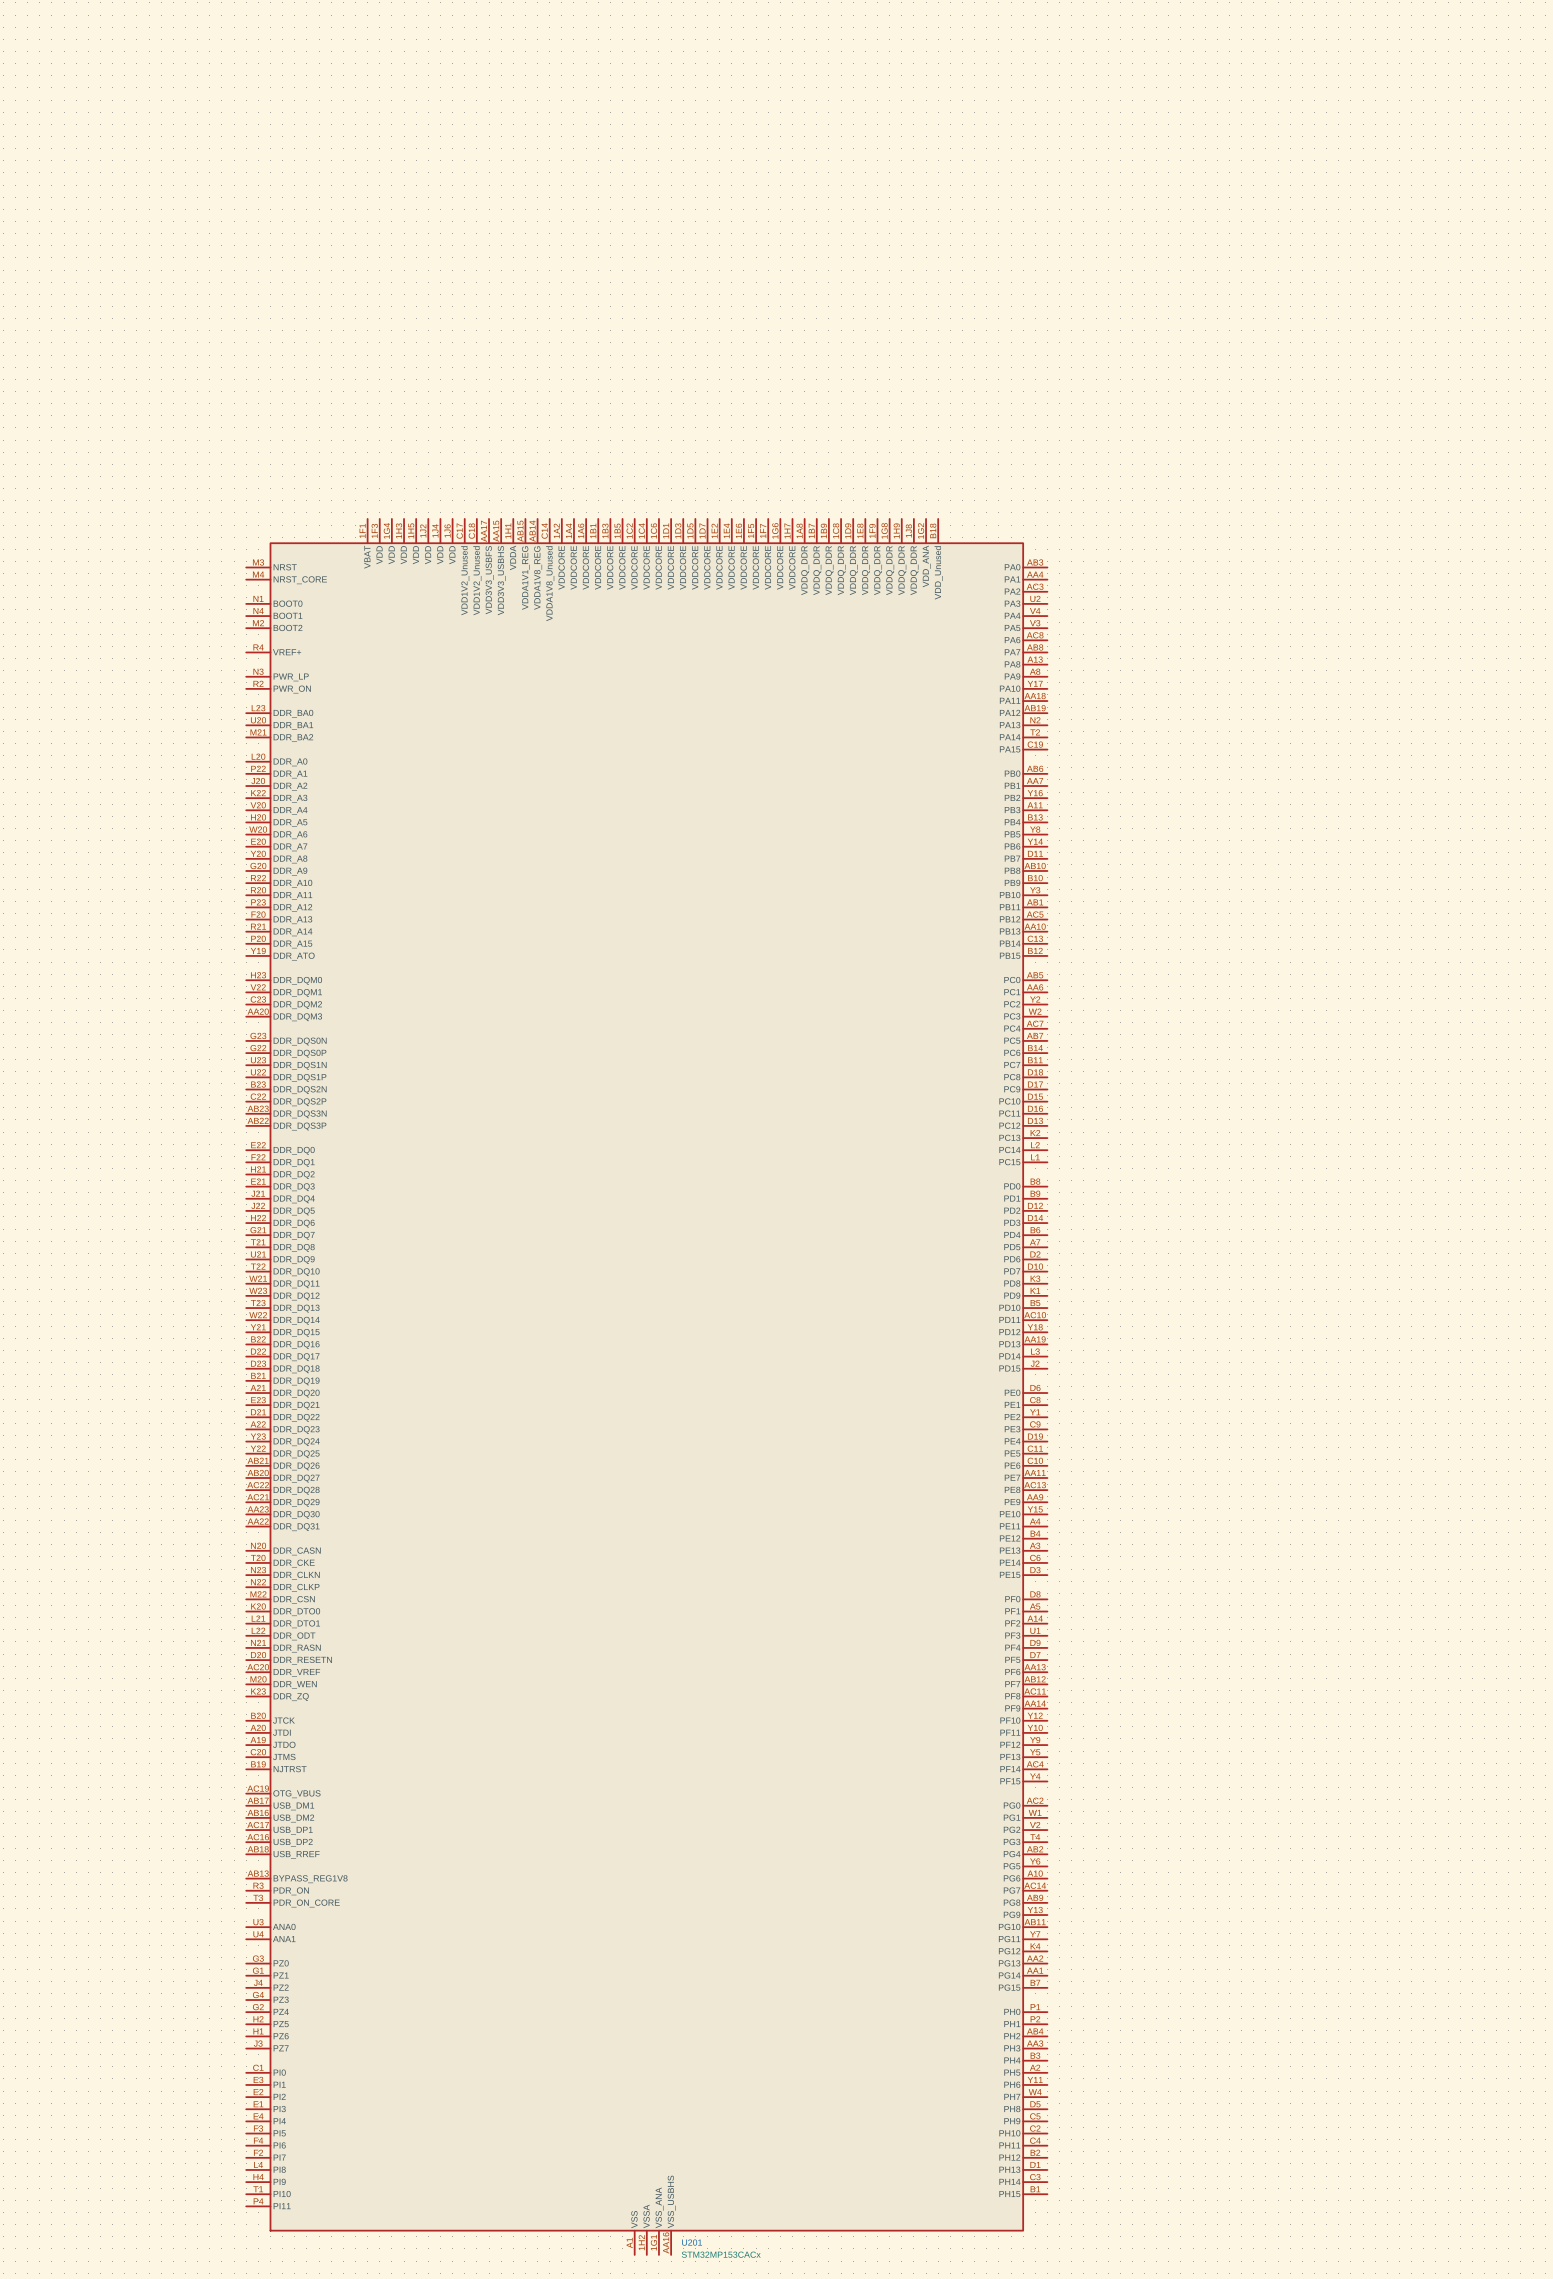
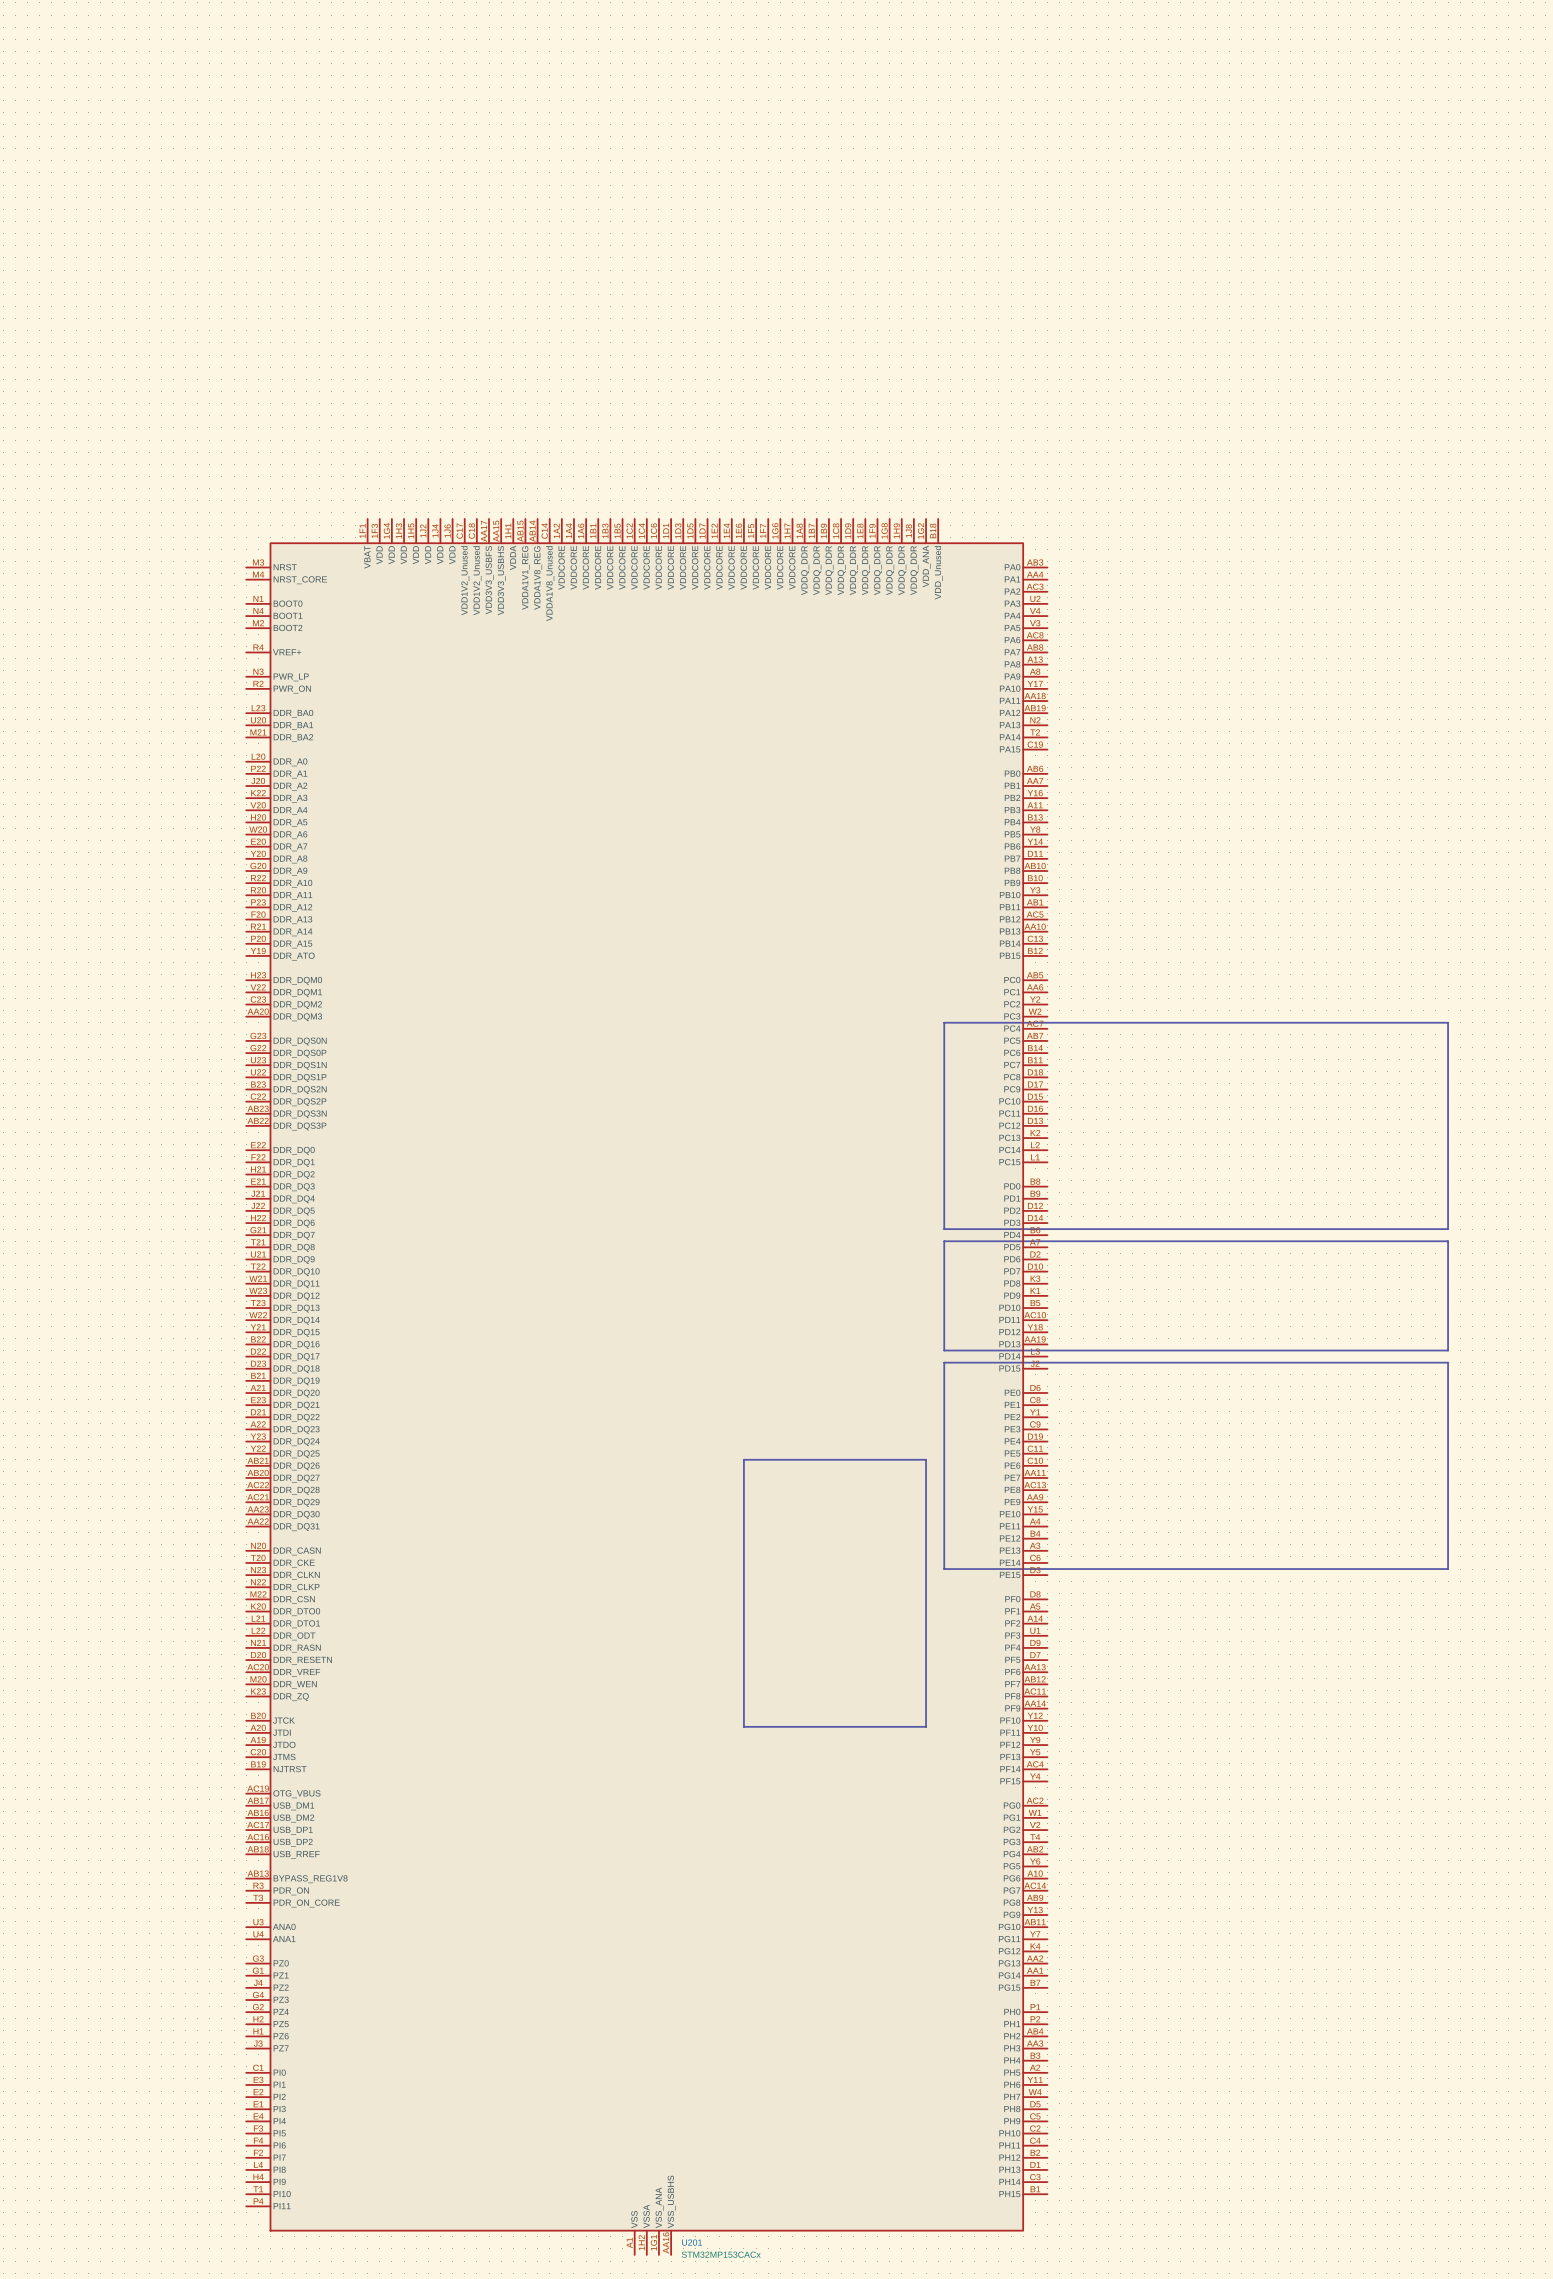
line: none -> (944, 1022) (1448, 1022) (1448, 1229) (944, 1229) (944, 1022)
line: none -> (944, 1241) (944, 1350) (1448, 1350) (1448, 1241) (944, 1241)
line: none -> (944, 1362) (944, 1569) (1448, 1569) (1448, 1362) (944, 1362)
line: none -> (743, 1459) (926, 1459) (926, 1726) (743, 1726) (743, 1459)

